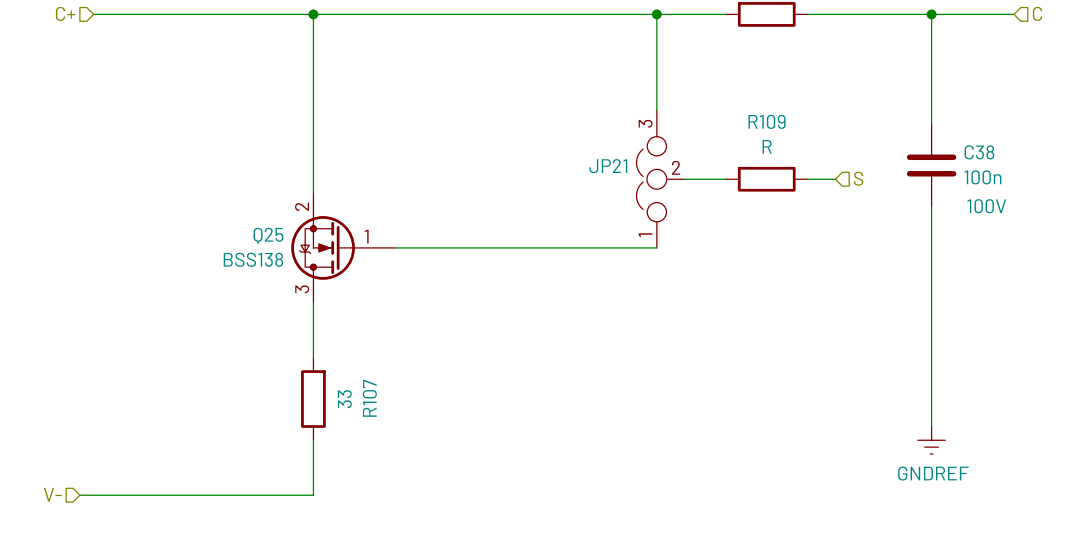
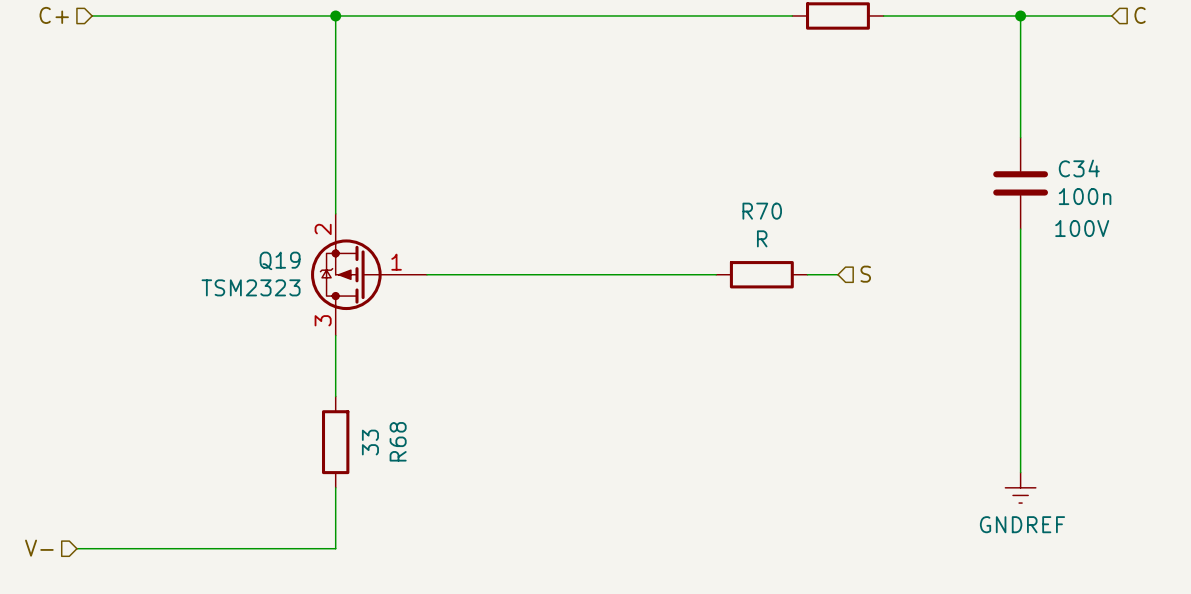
wire: (656, 14) (656, 110) -> none
junction: (656, 14) -> none
C38 name: C38 (979, 152) -> C34 (1079, 168)
hierarchical label position: S (858, 178) -> S (865, 274)
JP21: (660, 179) -> none
wire: (684, 179) (725, 179) -> none
R109: R (766, 179) -> none
wire: (807, 179) (835, 179) -> (807, 274) (837, 274)
Q25: BSS138 (343, 247) -> none
Q19: none -> TSM2323 (369, 274)
R70: none -> R (761, 274)
R107 name: R107 (369, 398) -> R68 (398, 441)

